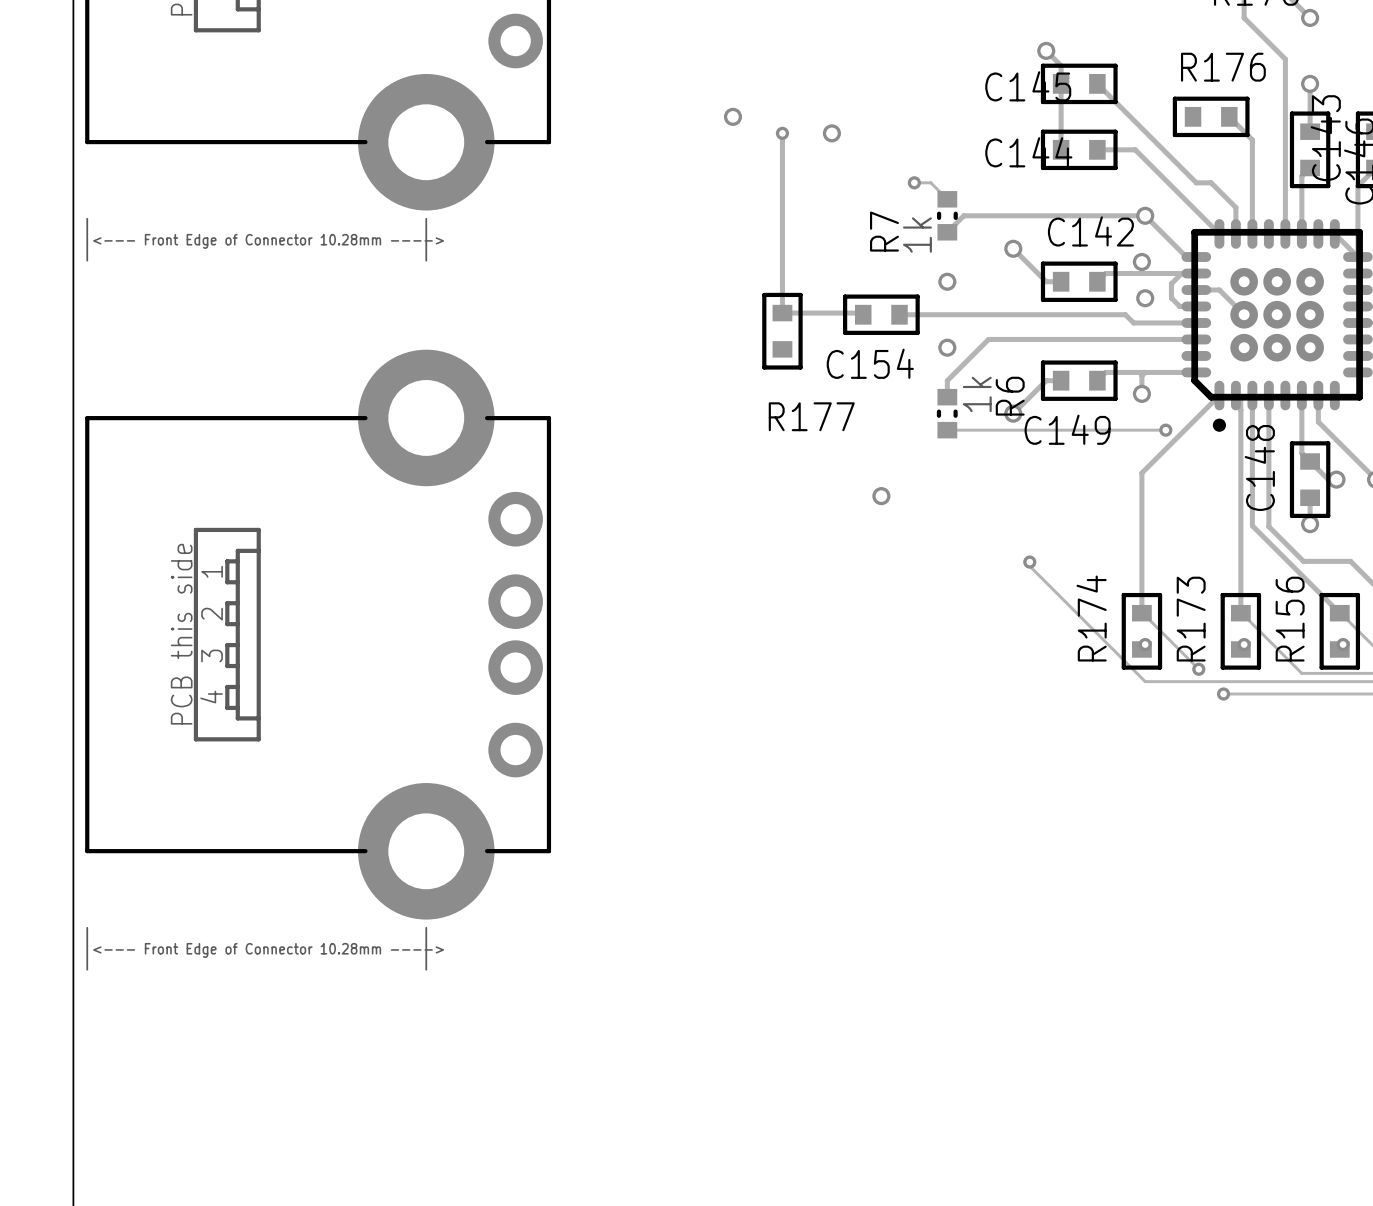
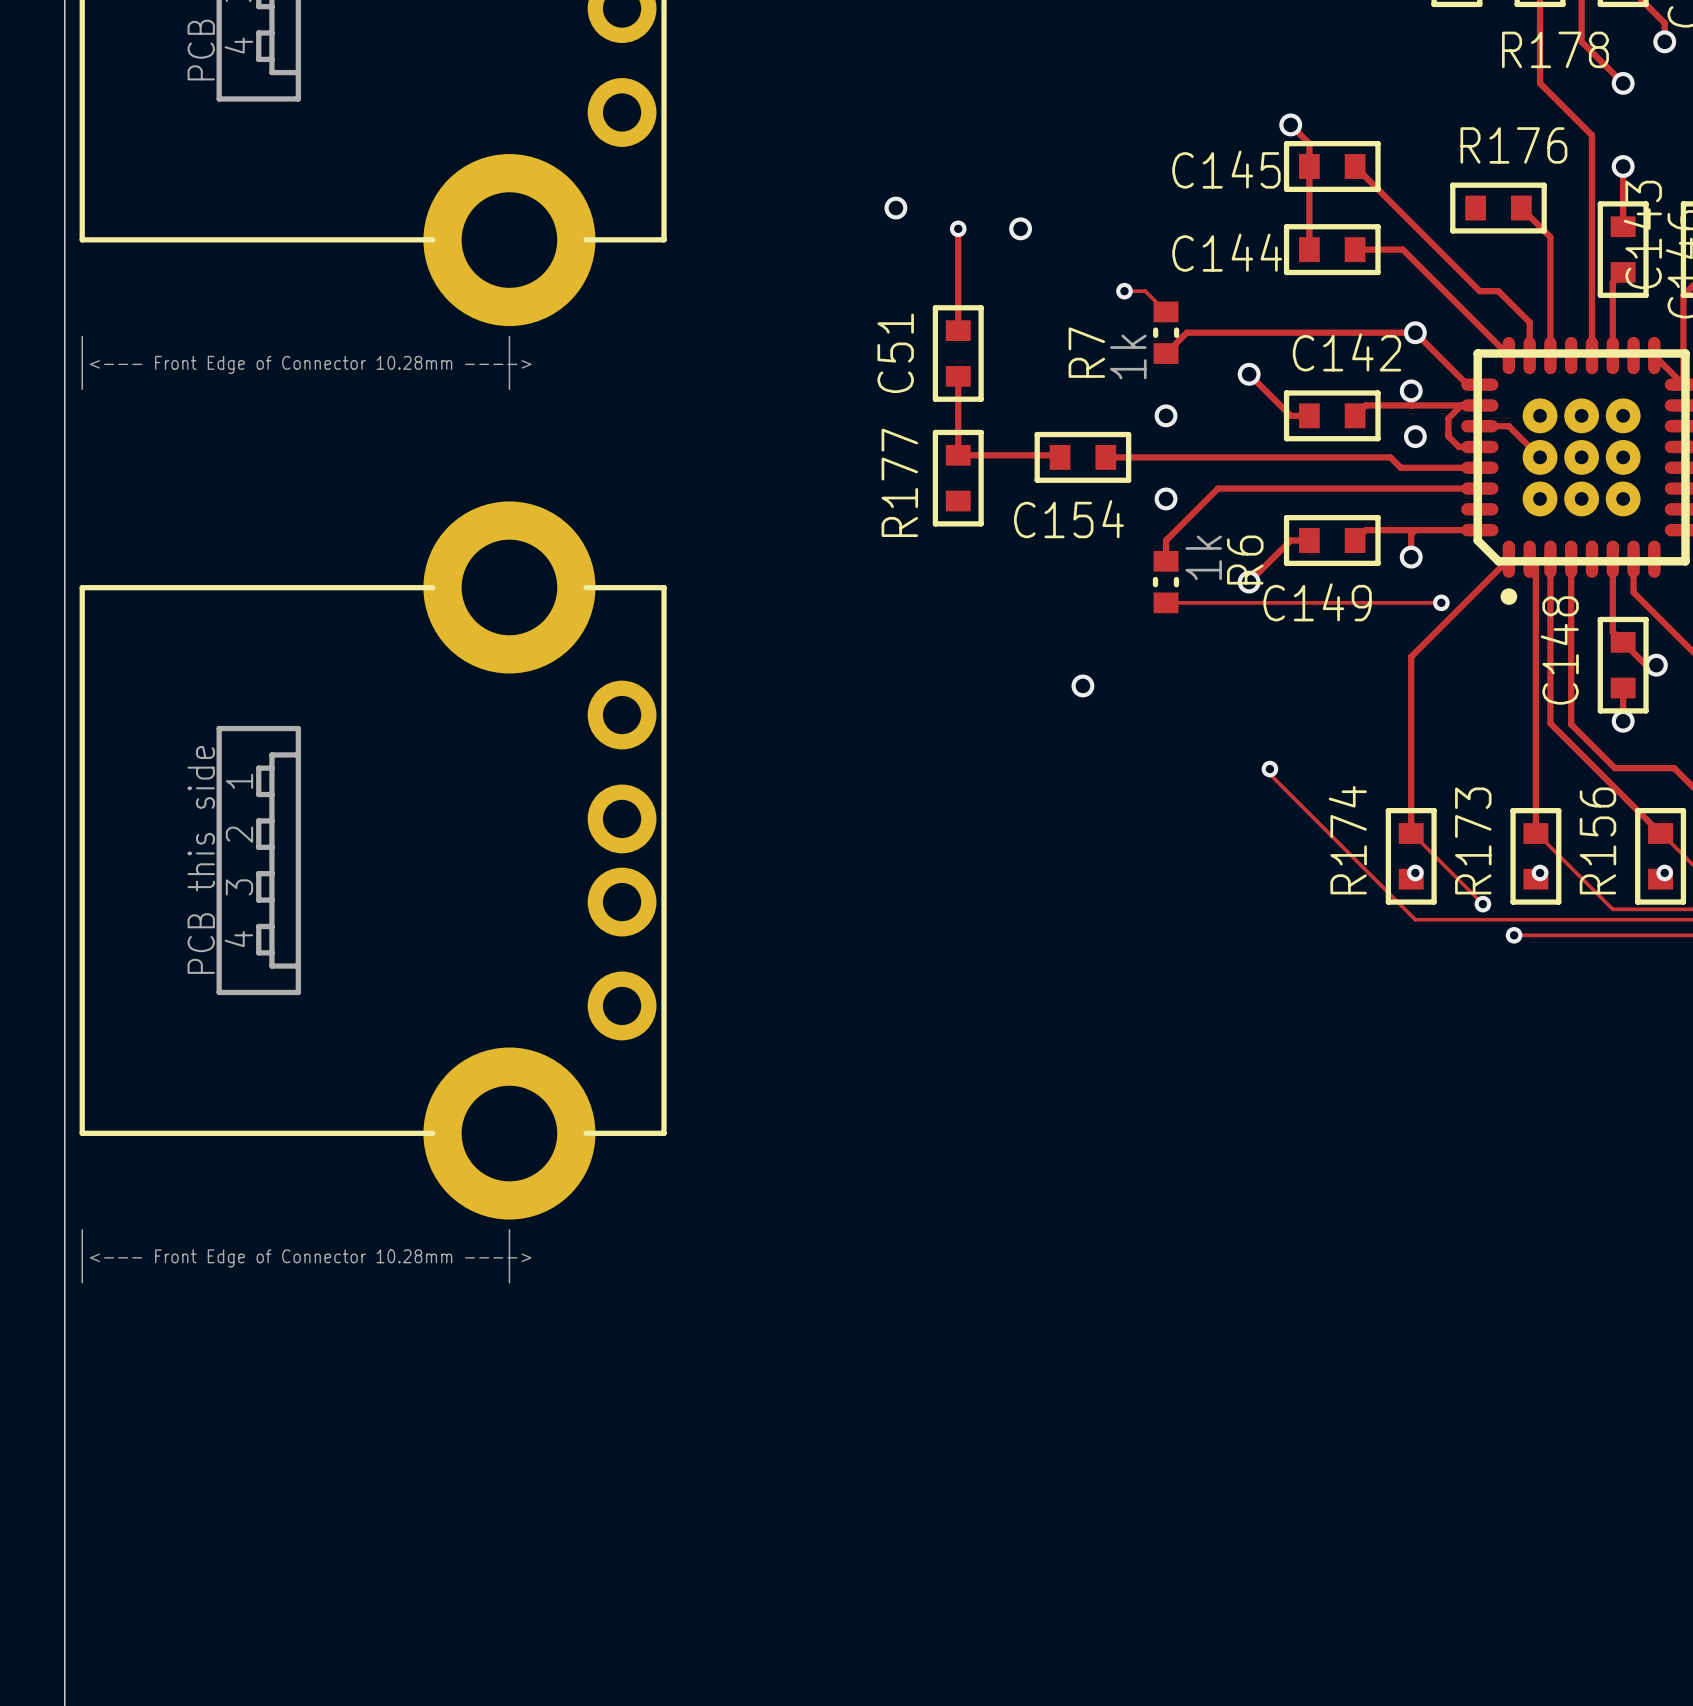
C145 name position: C145 (1028, 86) -> C145 (1226, 169)
C144 name position: C144 (1028, 152) -> C144 (1227, 252)
track: (782, 214) (782, 250) -> none
C51: none -> (958, 353)
R177 name rotation: 0° (811, 416) -> 90° counterclockwise (899, 482)
R177 name position: R177 (811, 416) -> R177 (899, 482)

